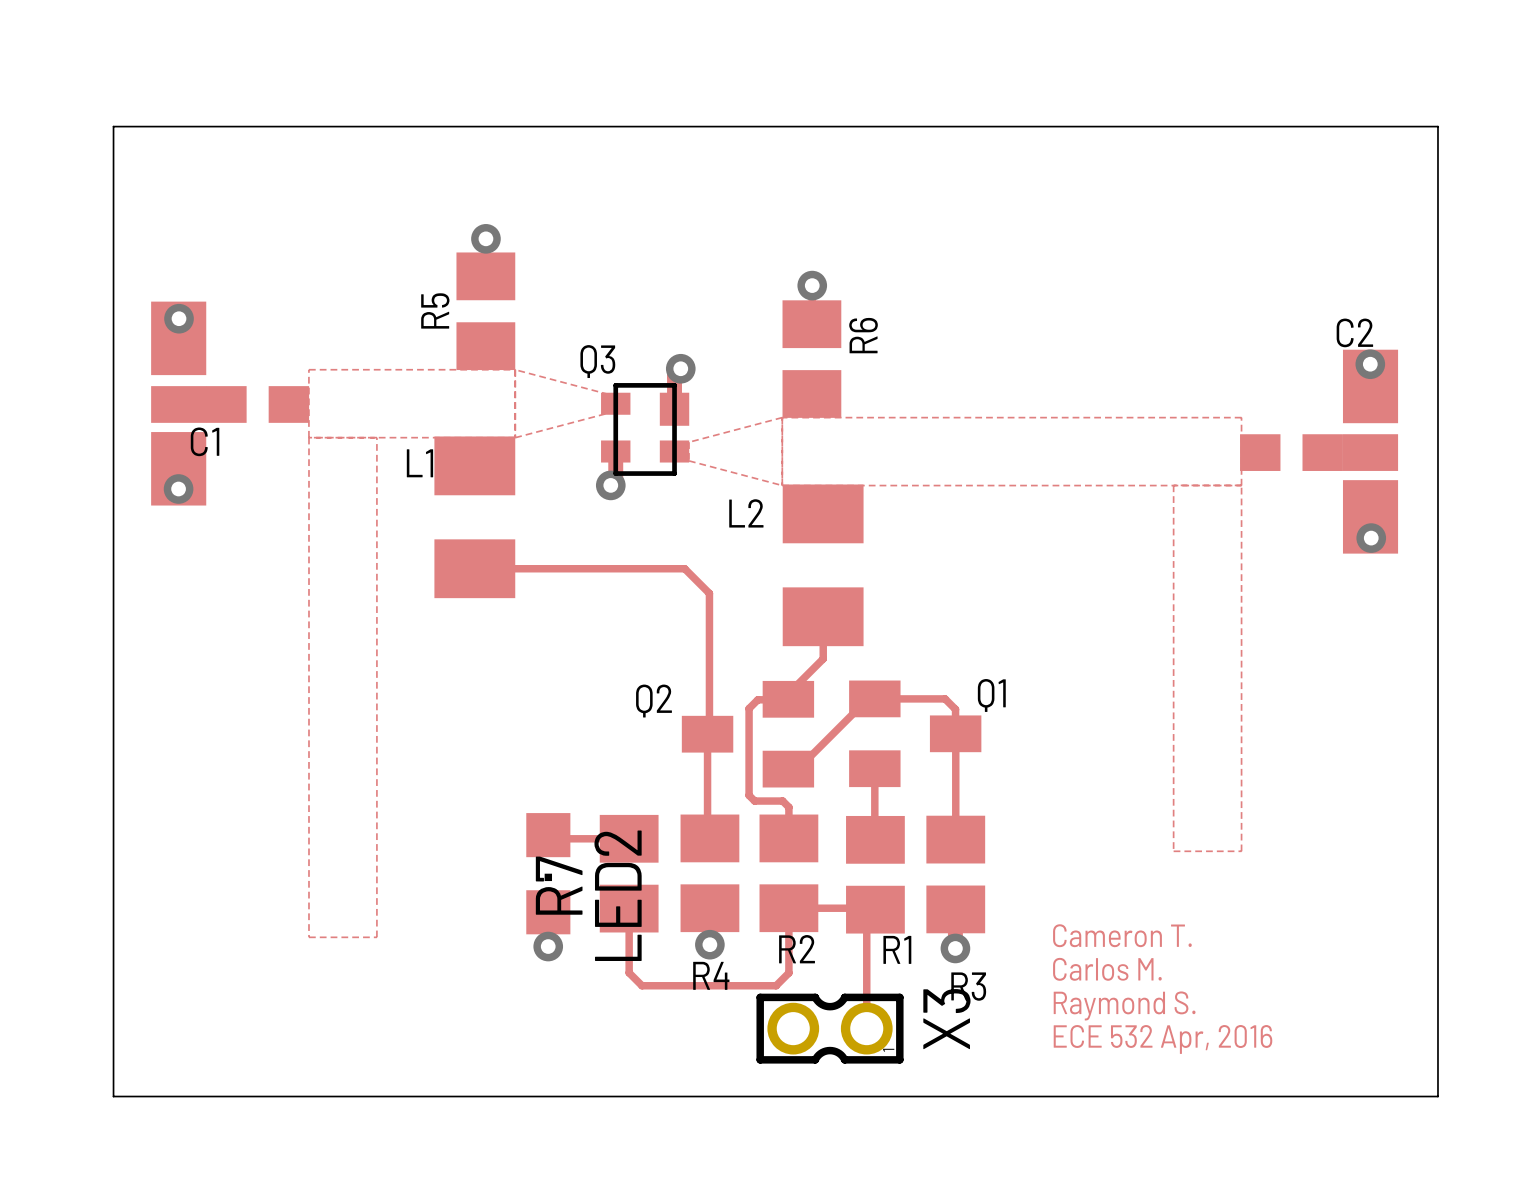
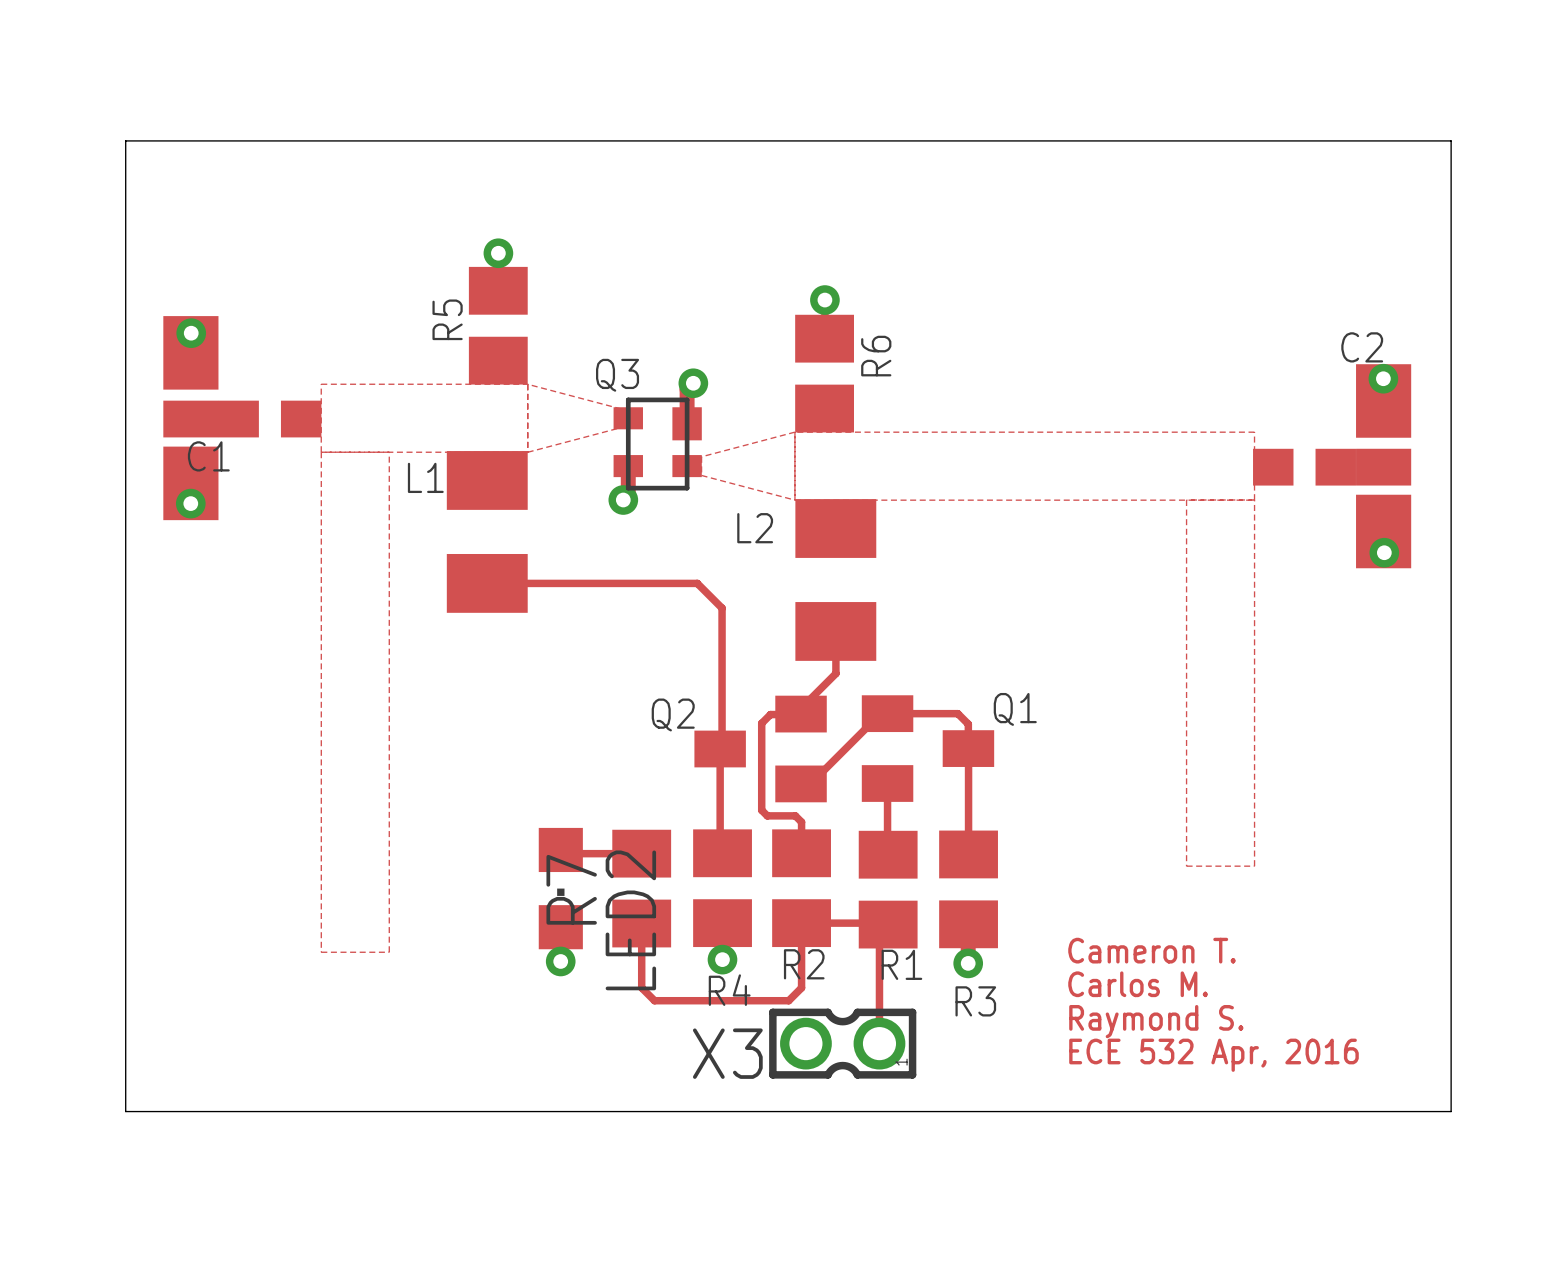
X3 name rotation: 0° (946, 1019) -> 90° clockwise (727, 1053)
X3 name position: X3 (946, 1019) -> X3 (727, 1053)

